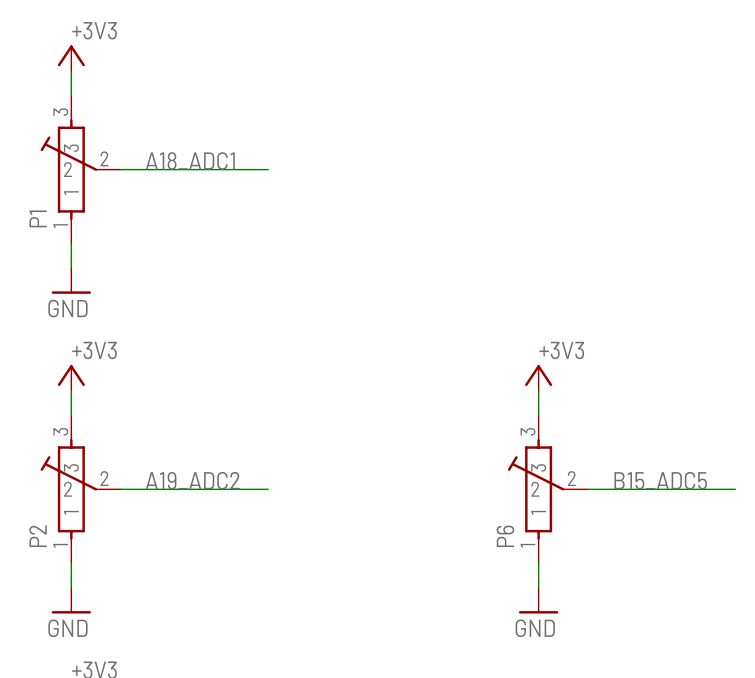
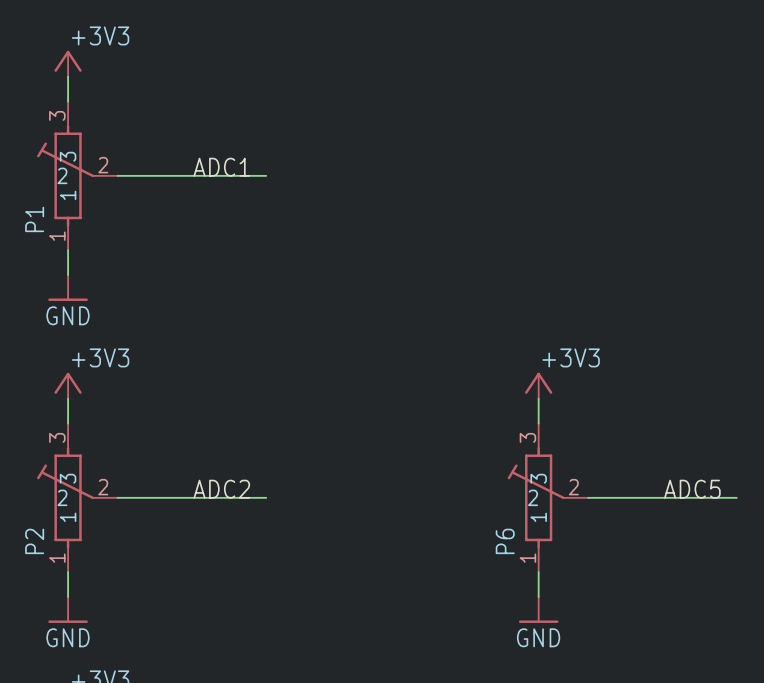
label: A18_ADC1 (190, 161) -> ADC1 (221, 167)
label: A19_ADC2 (192, 480) -> ADC2 (221, 489)
label: B15_ADC5 (660, 480) -> ADC5 (692, 489)

